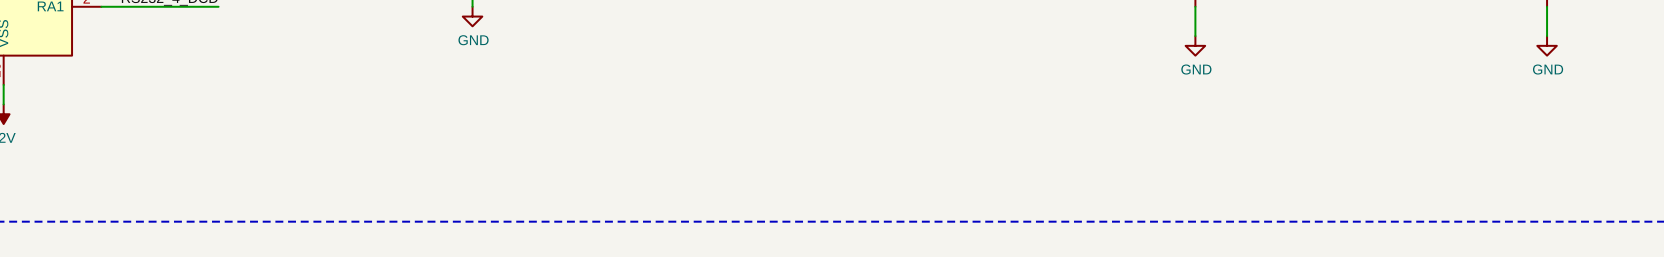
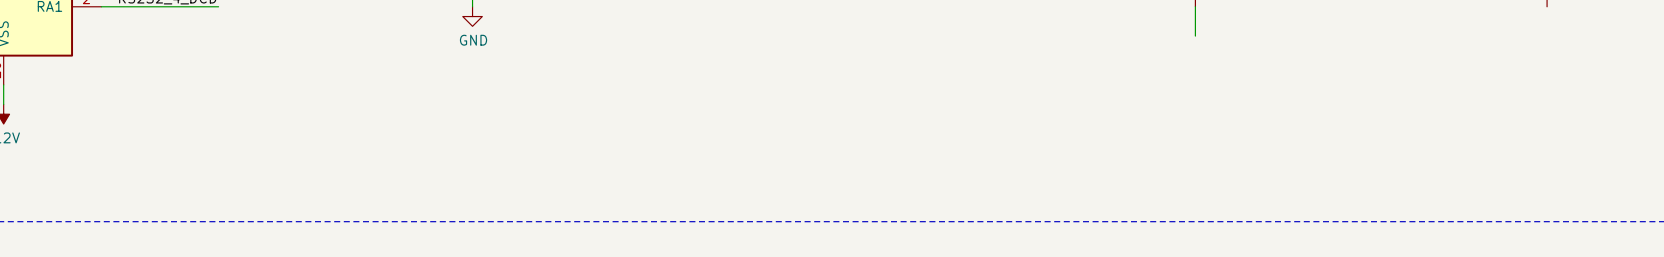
wire: (1547, 6) (1547, 36) -> none
power symbol: GND (1195, 45) -> none
power symbol: GND (1547, 45) -> none

